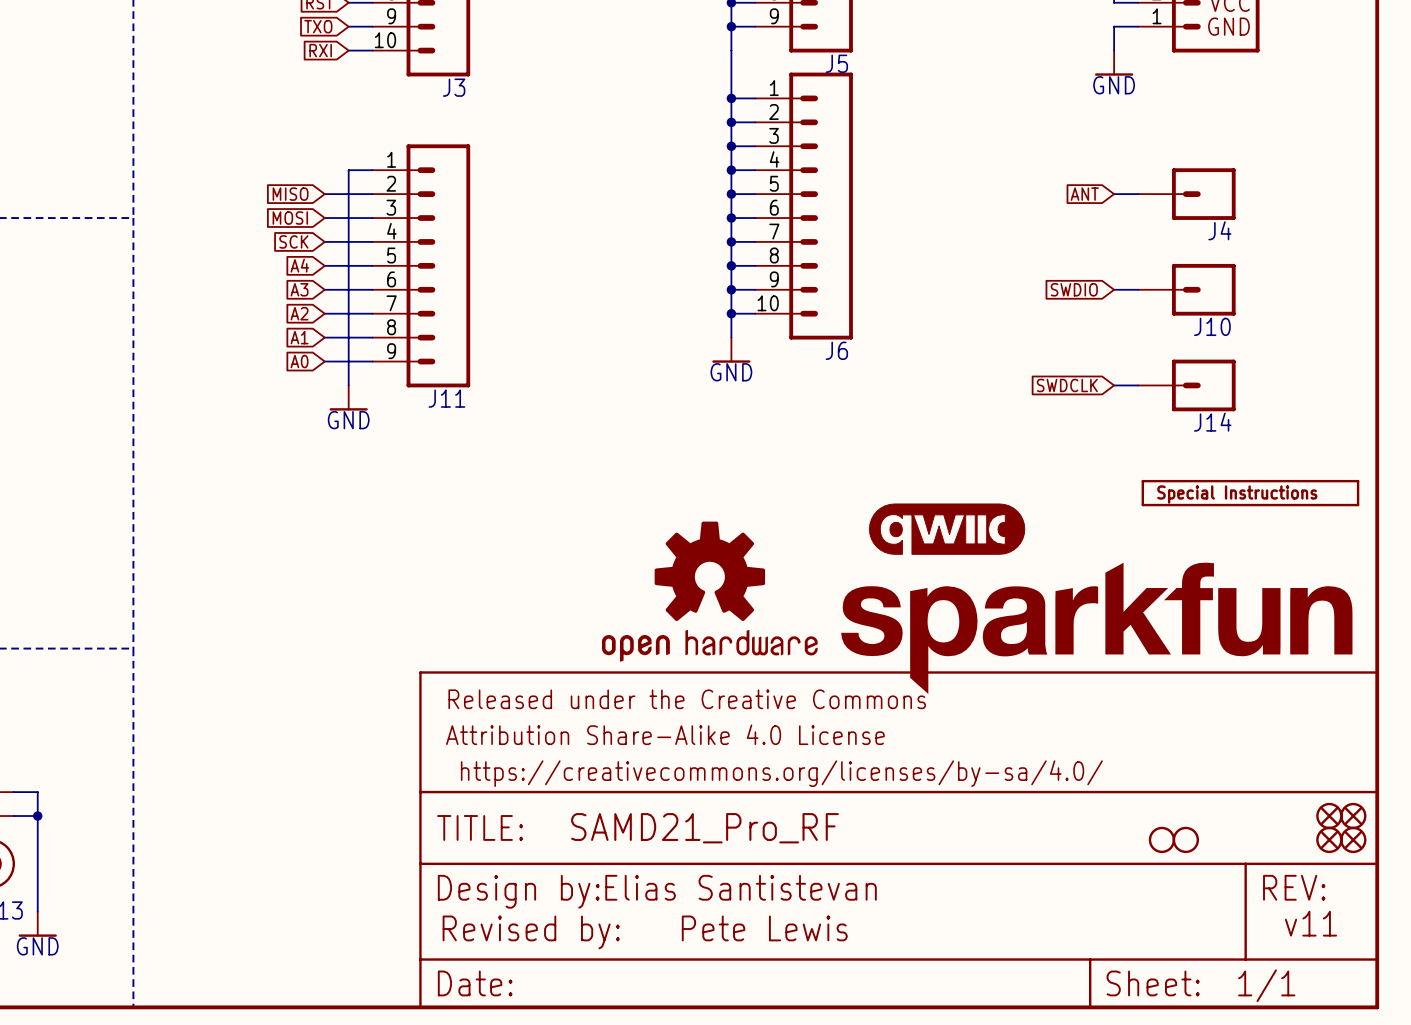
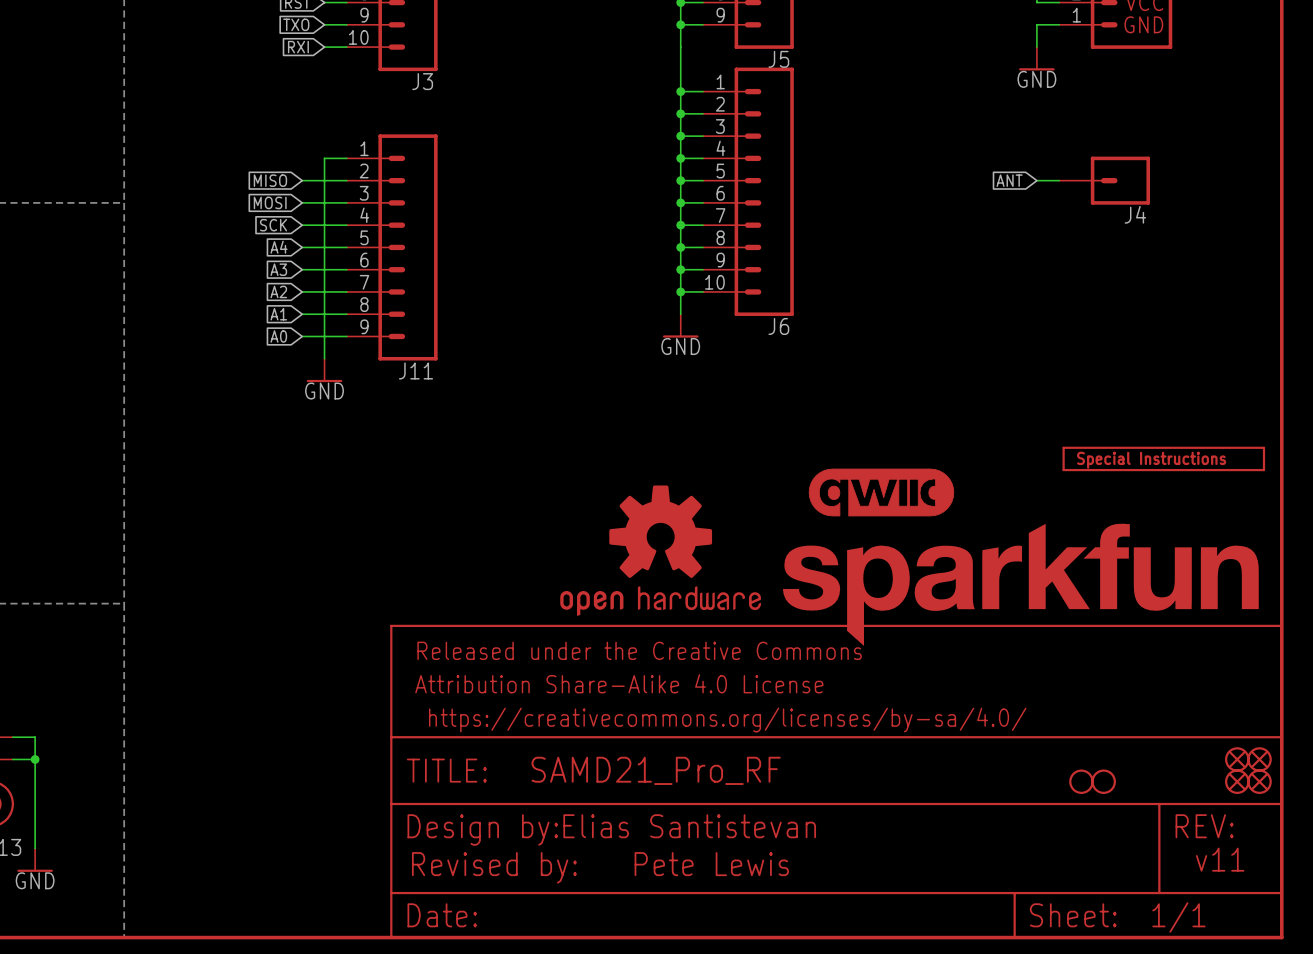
global label: SWDIO (1074, 289) -> none
wire: (1114, 289) (1138, 289) -> none
J10: (1186, 289) -> none
global label: SWDCLK (1067, 385) -> none
wire: (1114, 385) (1138, 385) -> none
J14: (1186, 385) -> none

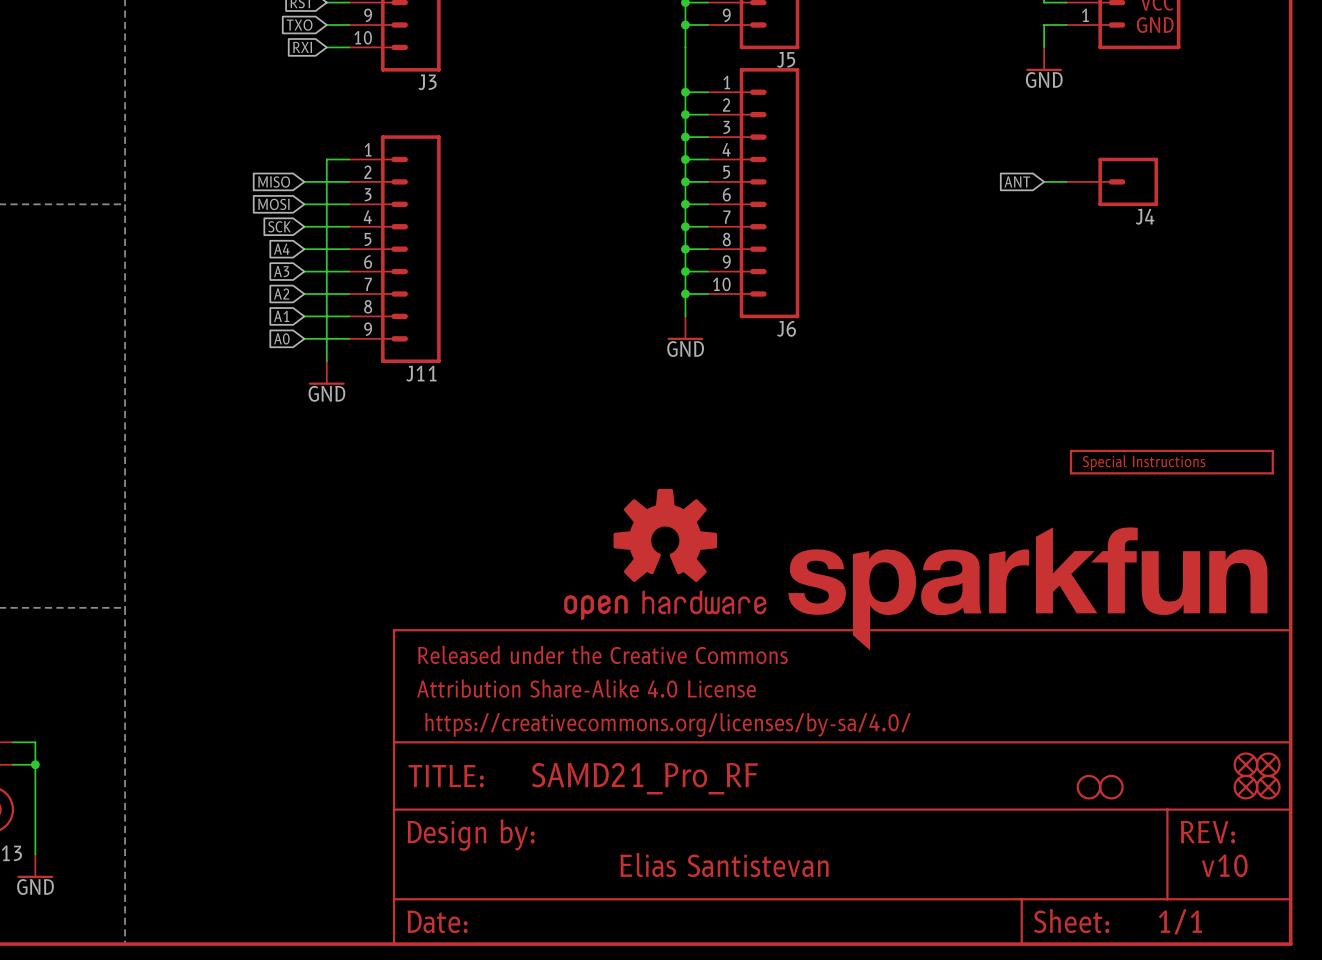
part: (881, 492) -> none
text position: Elias Santistevan (689, 826) -> Elias Santistevan (724, 865)
text: v11 (1220, 859) -> v10 (1224, 865)
text: Pete Lewis (711, 864) -> none
text: Revised by: (494, 867) -> none

